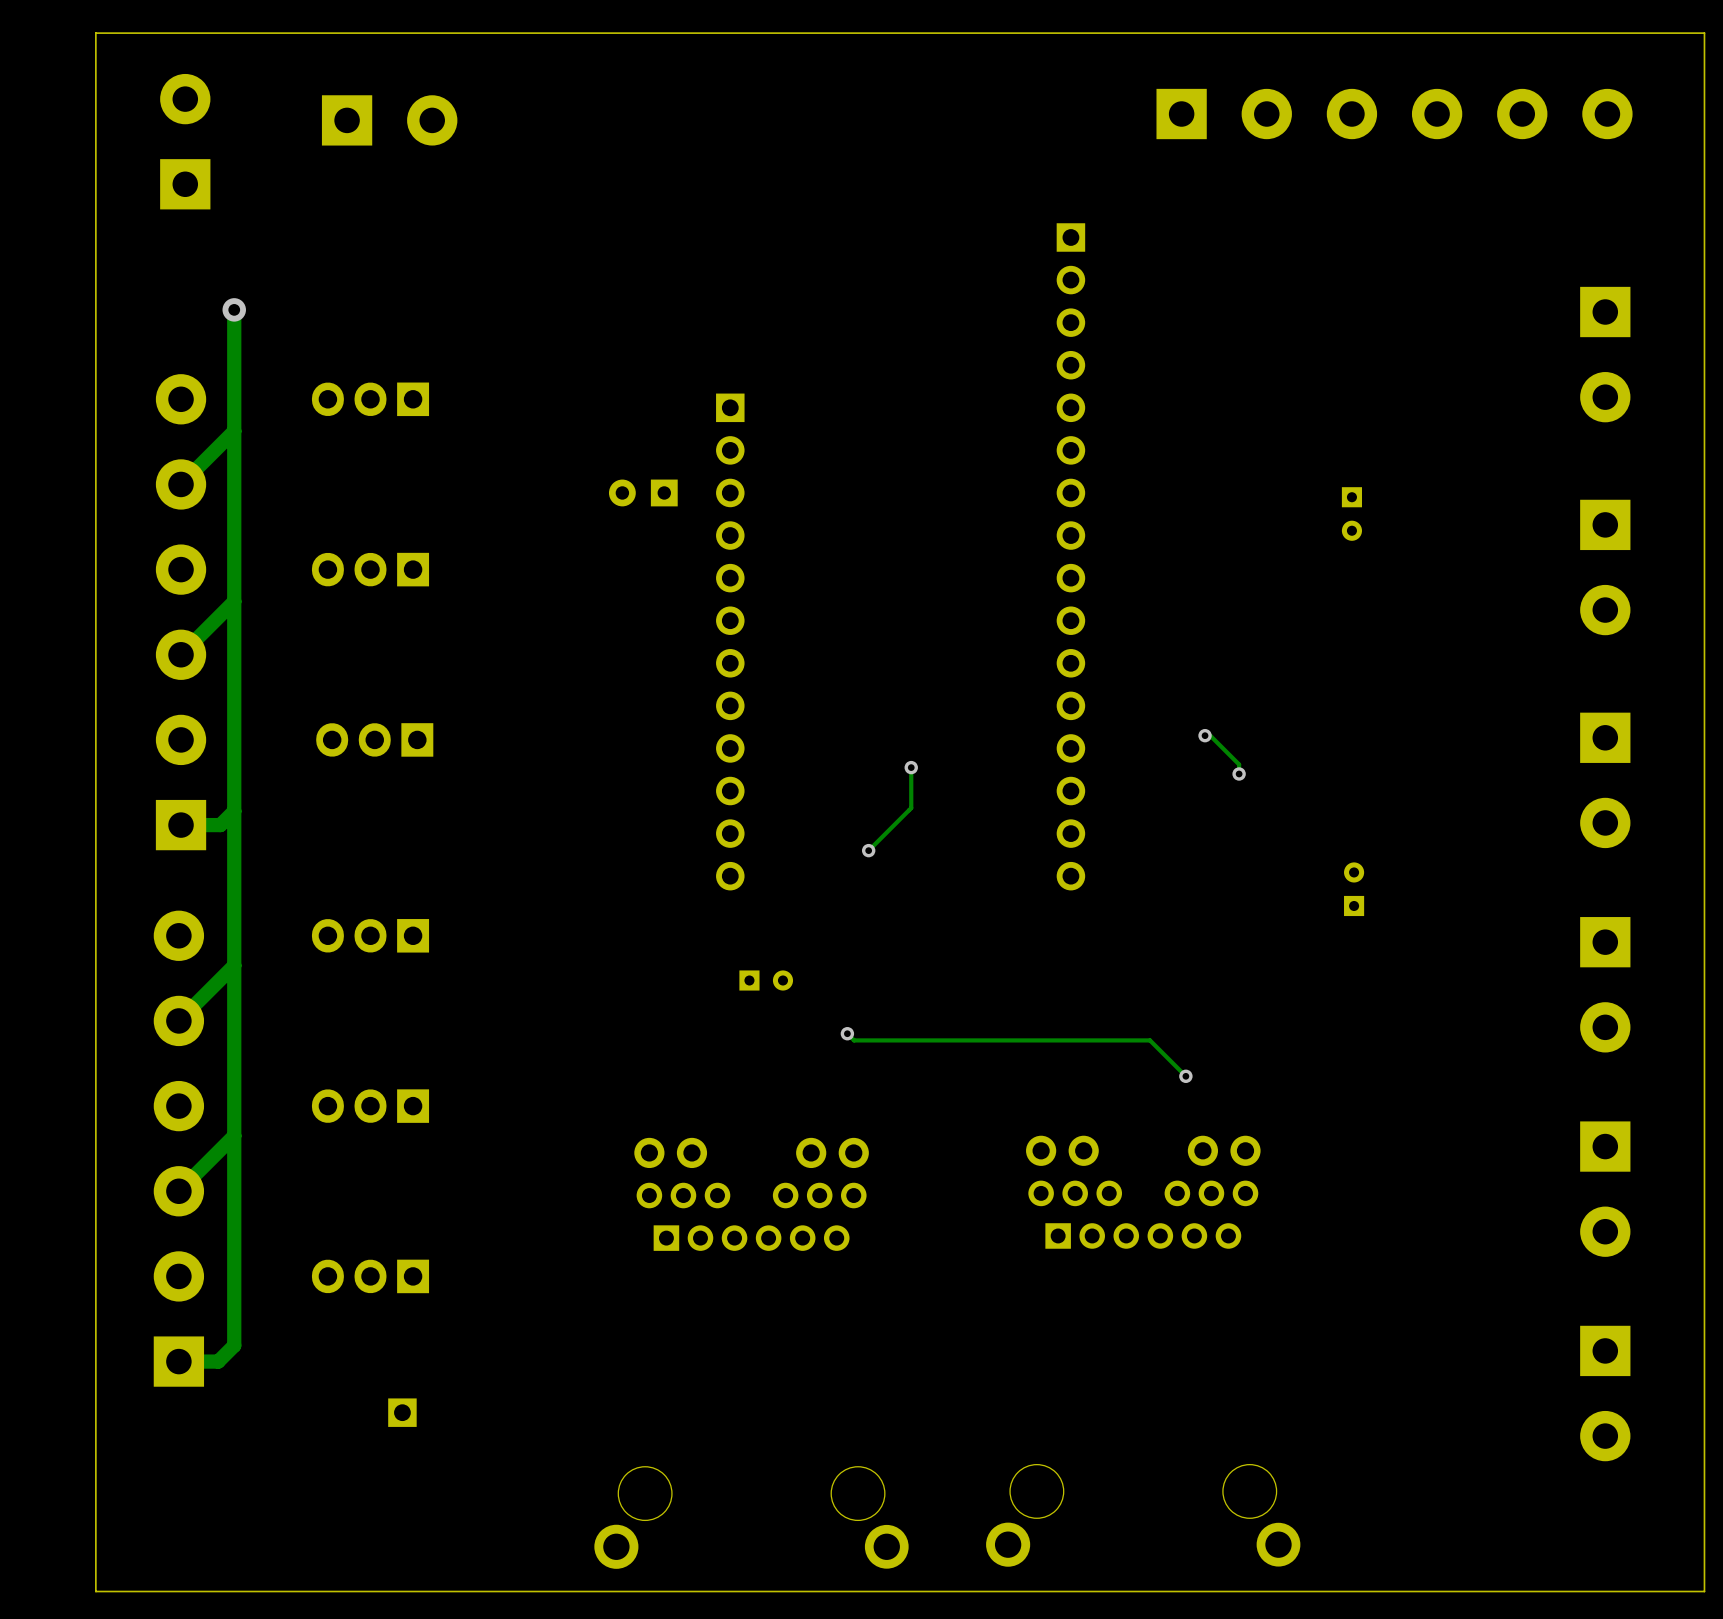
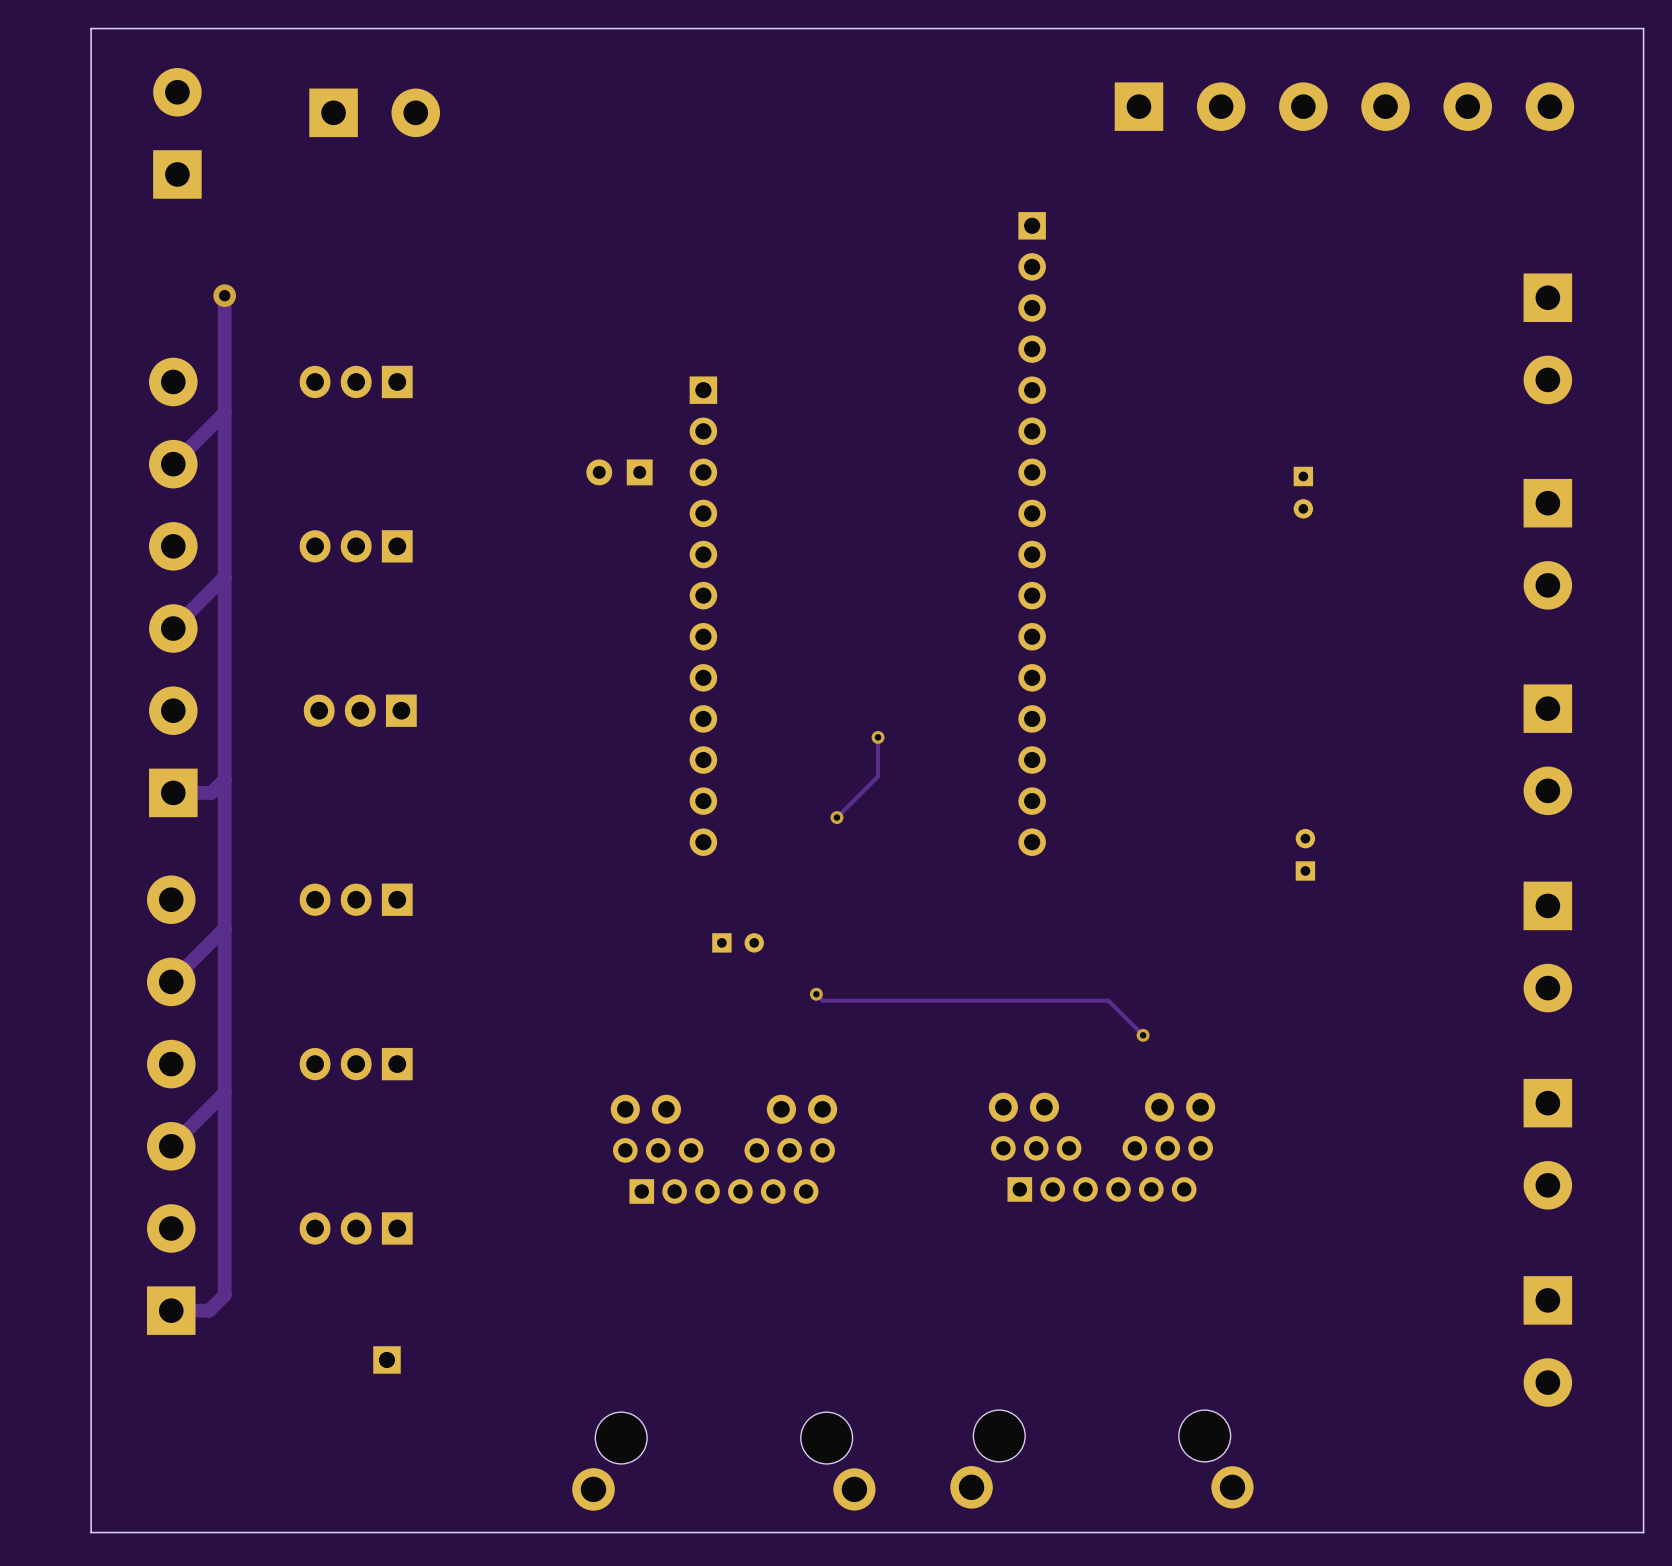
track: (1205, 735) (1210, 735) (1239, 764) (1239, 773) -> none
via: (1205, 735) -> none
via: (1239, 773) -> none

